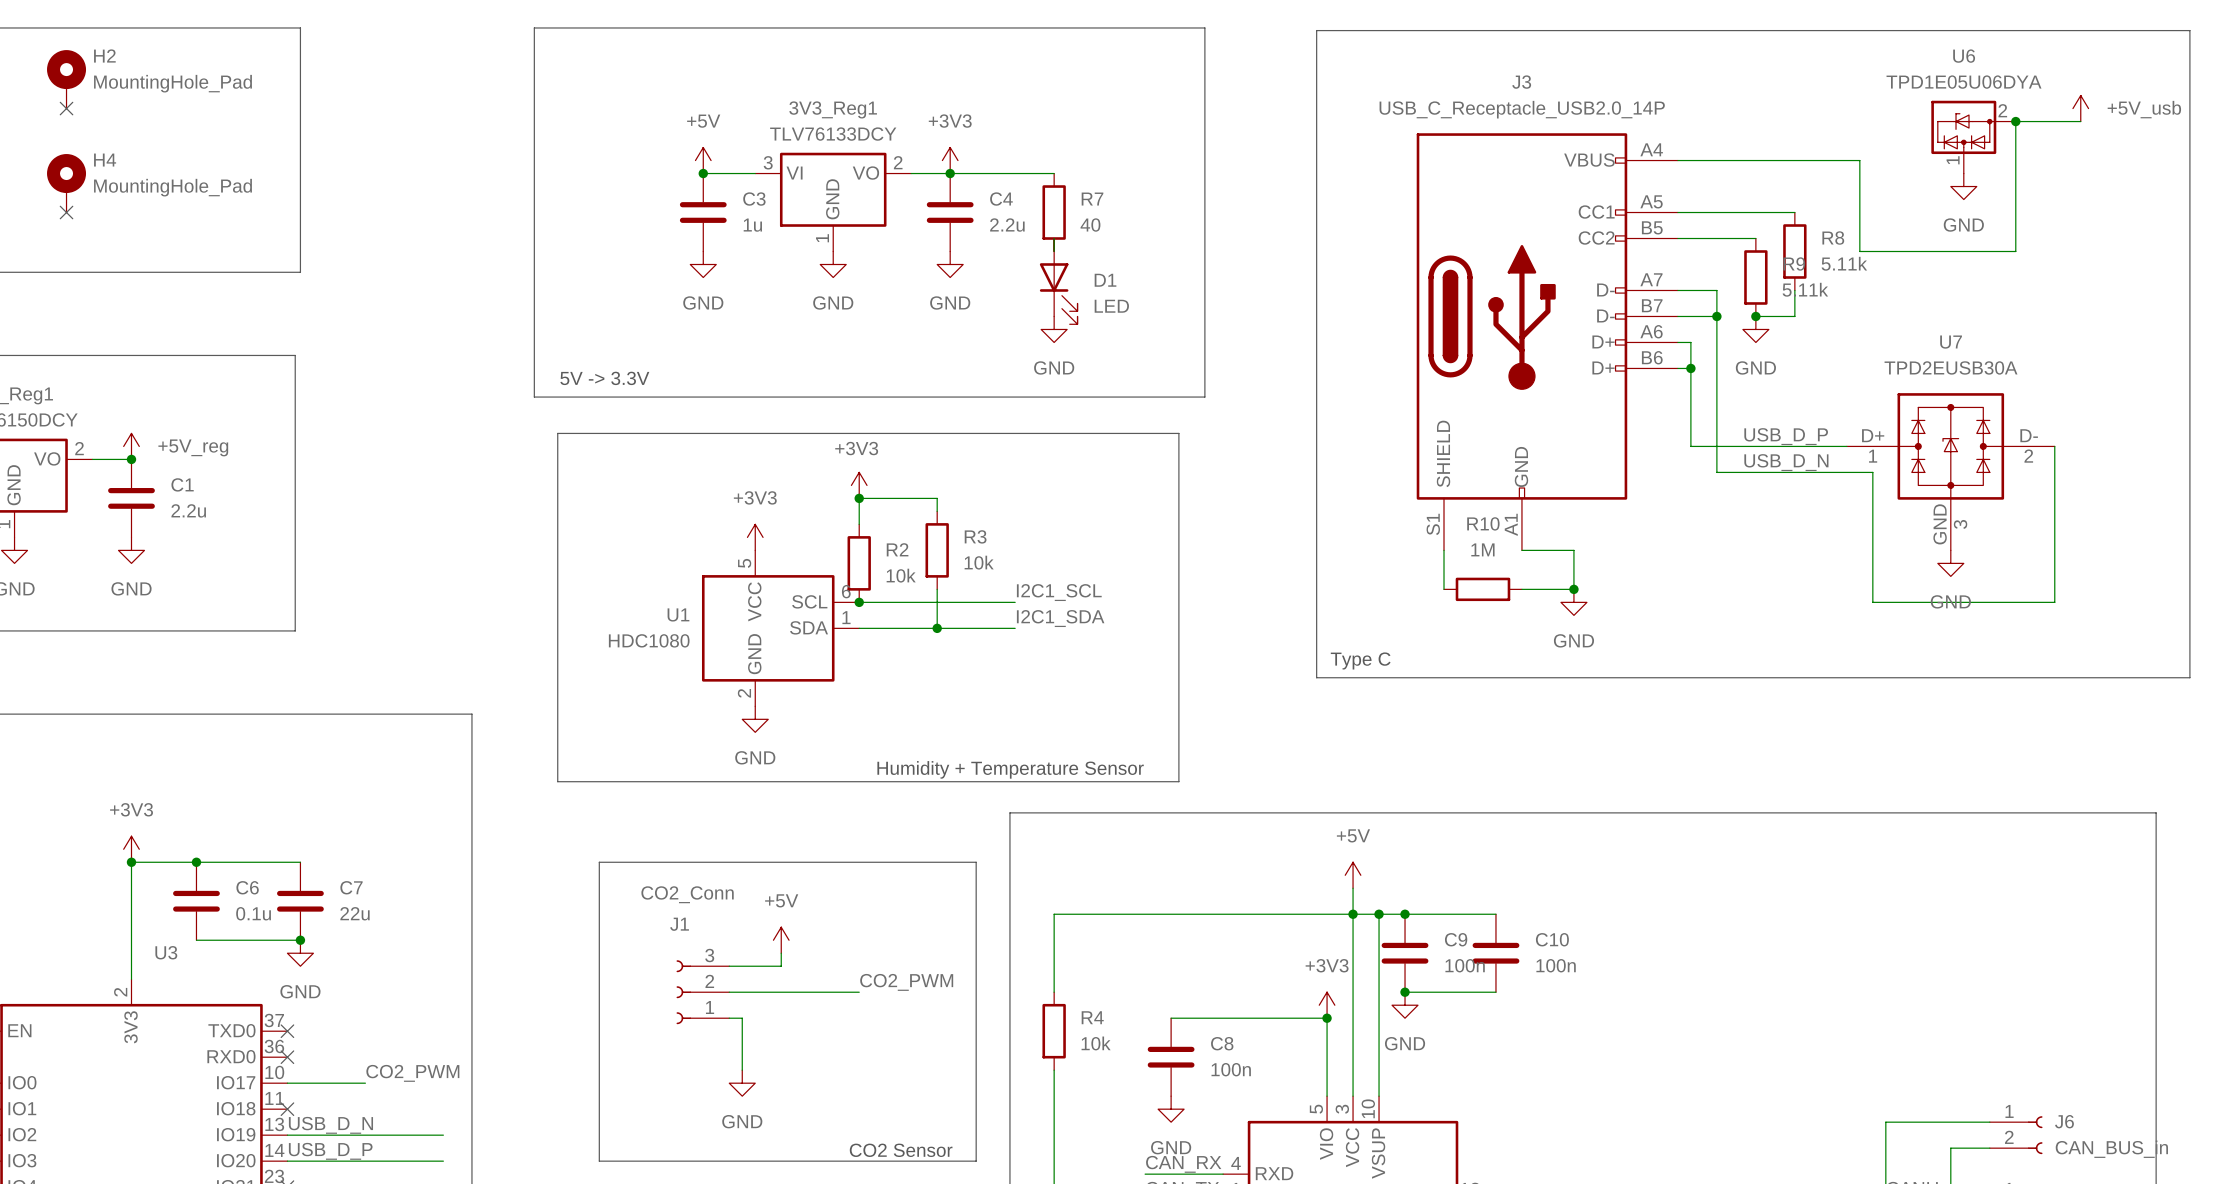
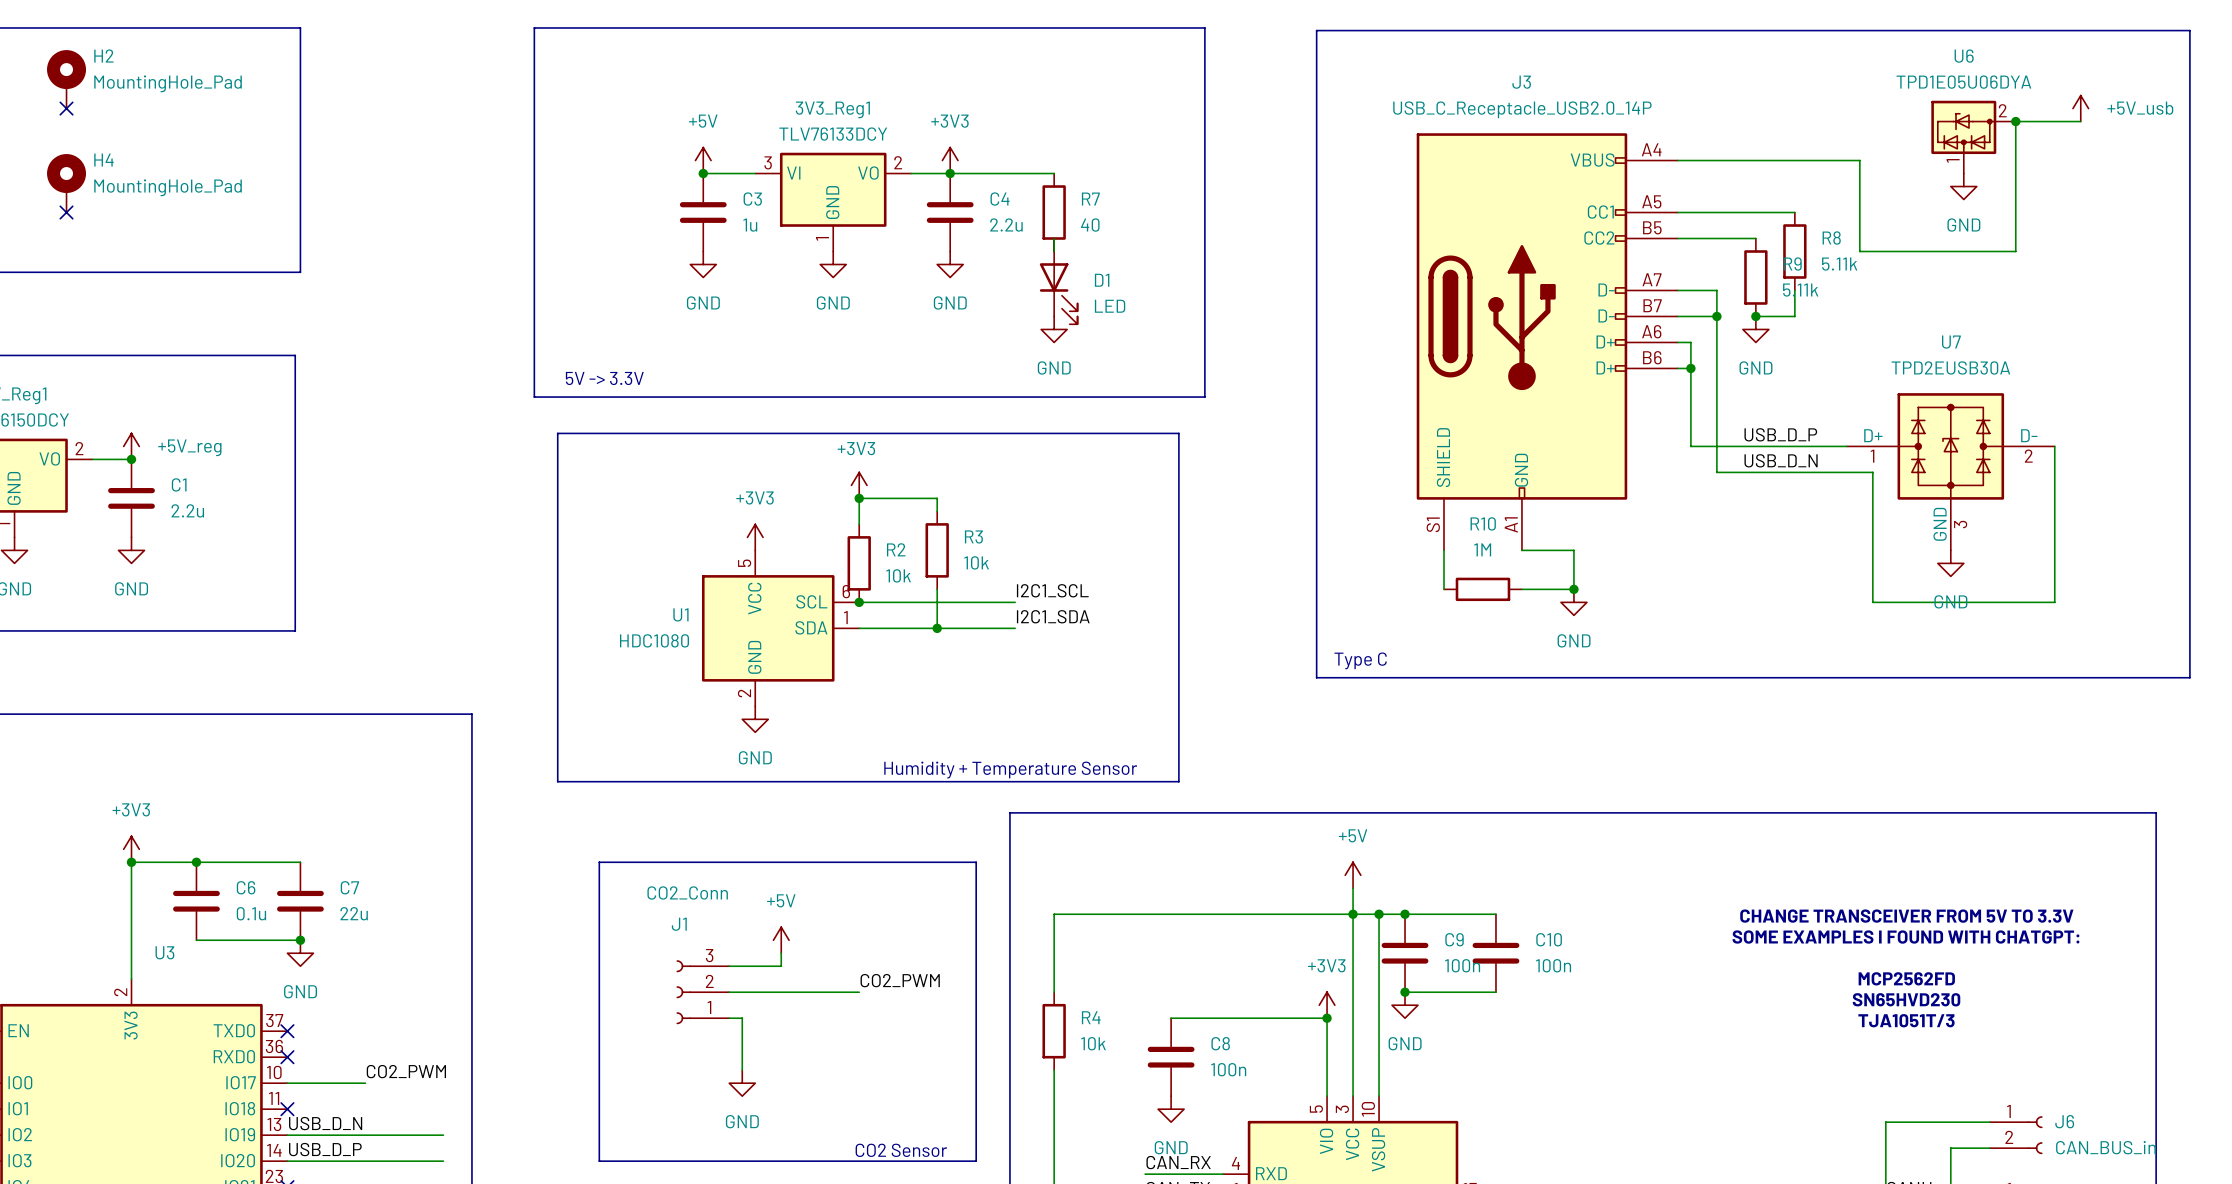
text: none -> CHANGE TRANSCEIVER FROM 5V TO 3.3V (1906, 916)
text: none -> SOME EXAMPLES I FOUND WITH CHATGPT: (1905, 937)
text: none -> MCP2562FD (1906, 978)
text: none -> SN65HVD230 (1906, 999)
text: none -> TJA1051T/3 (1906, 1020)

